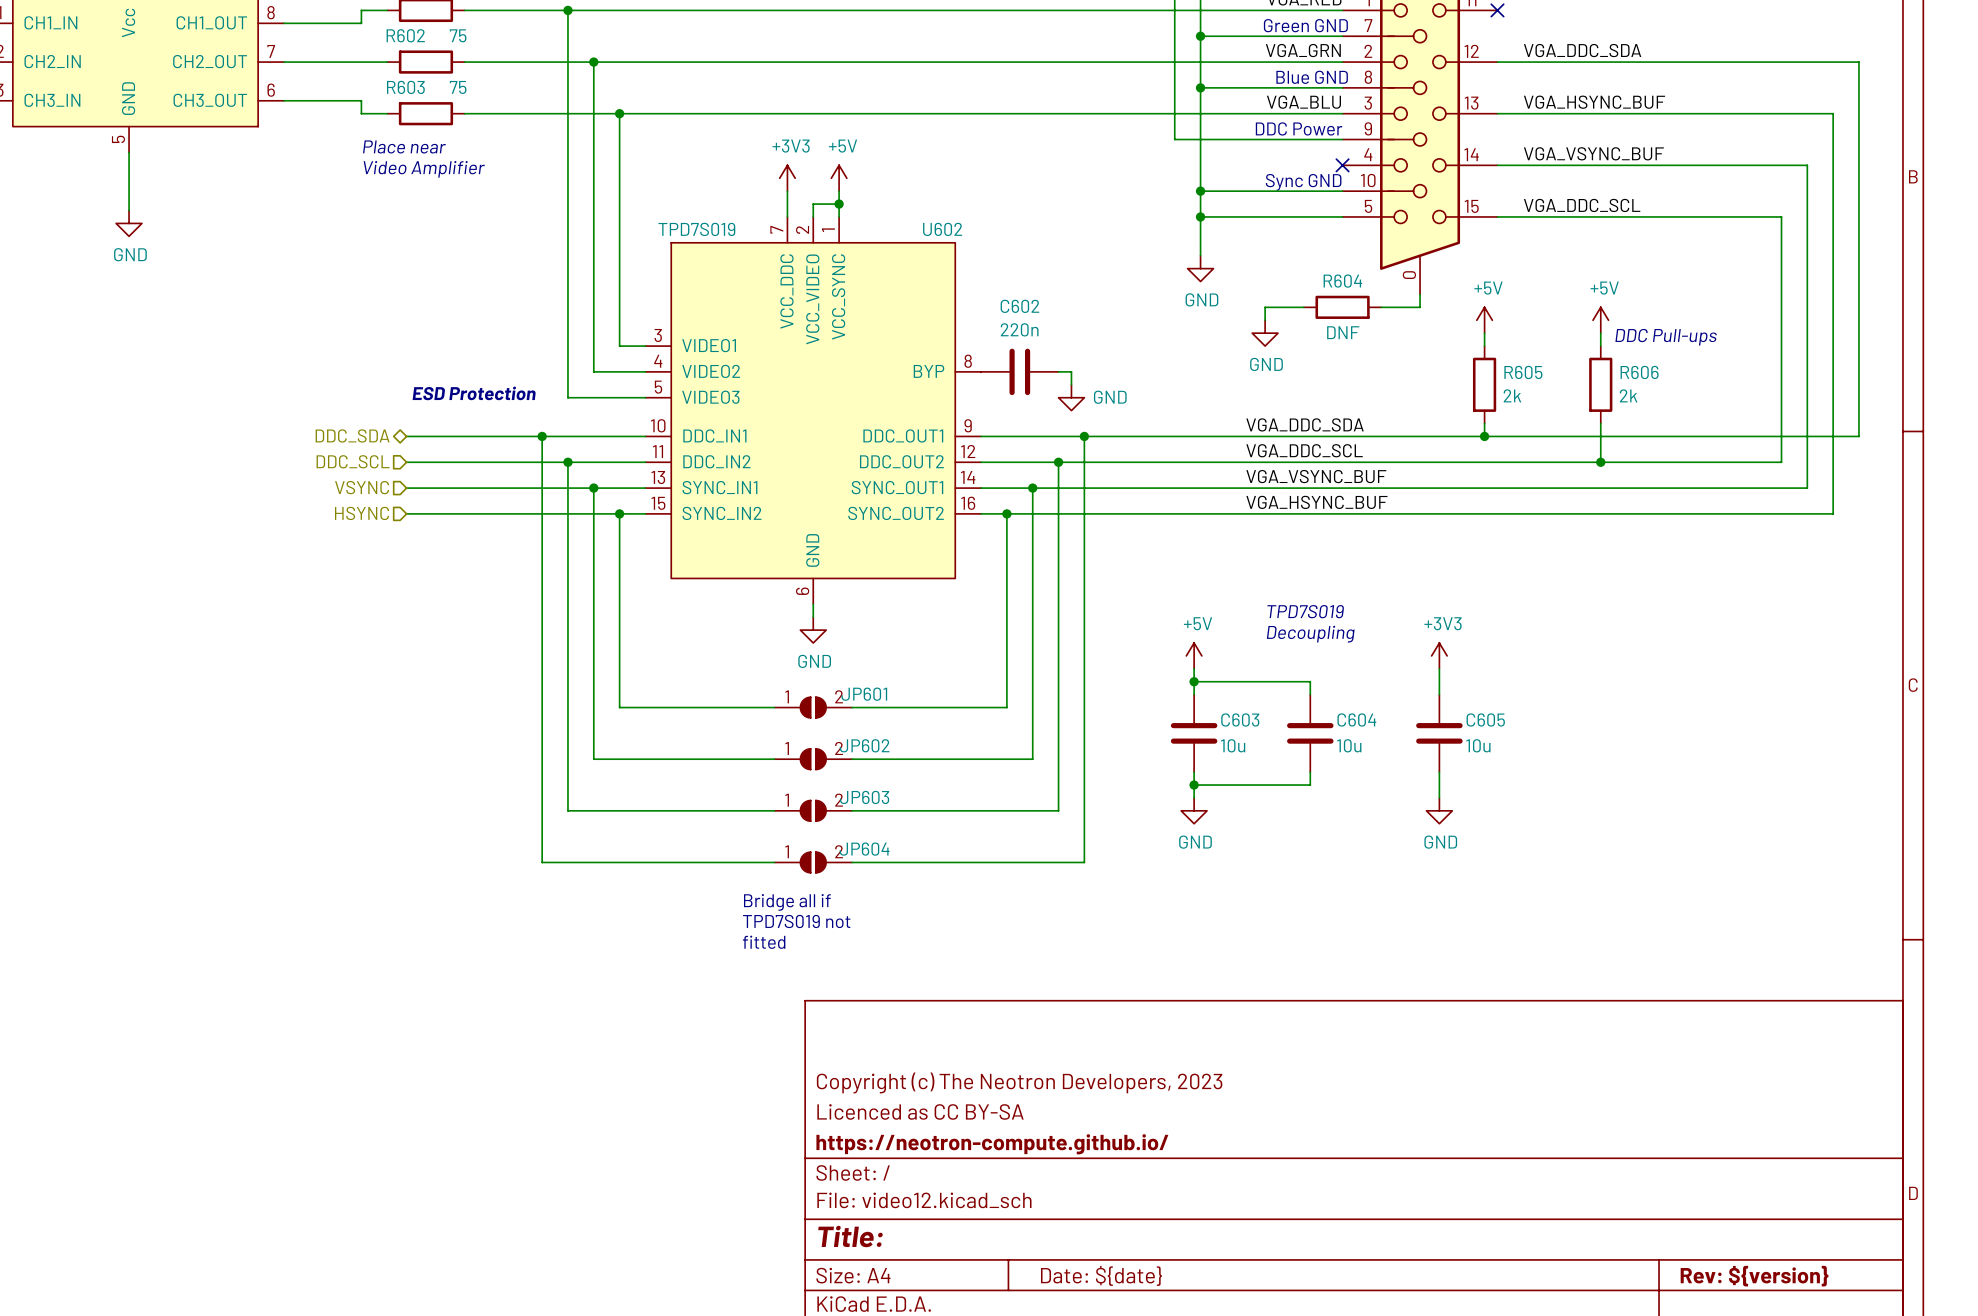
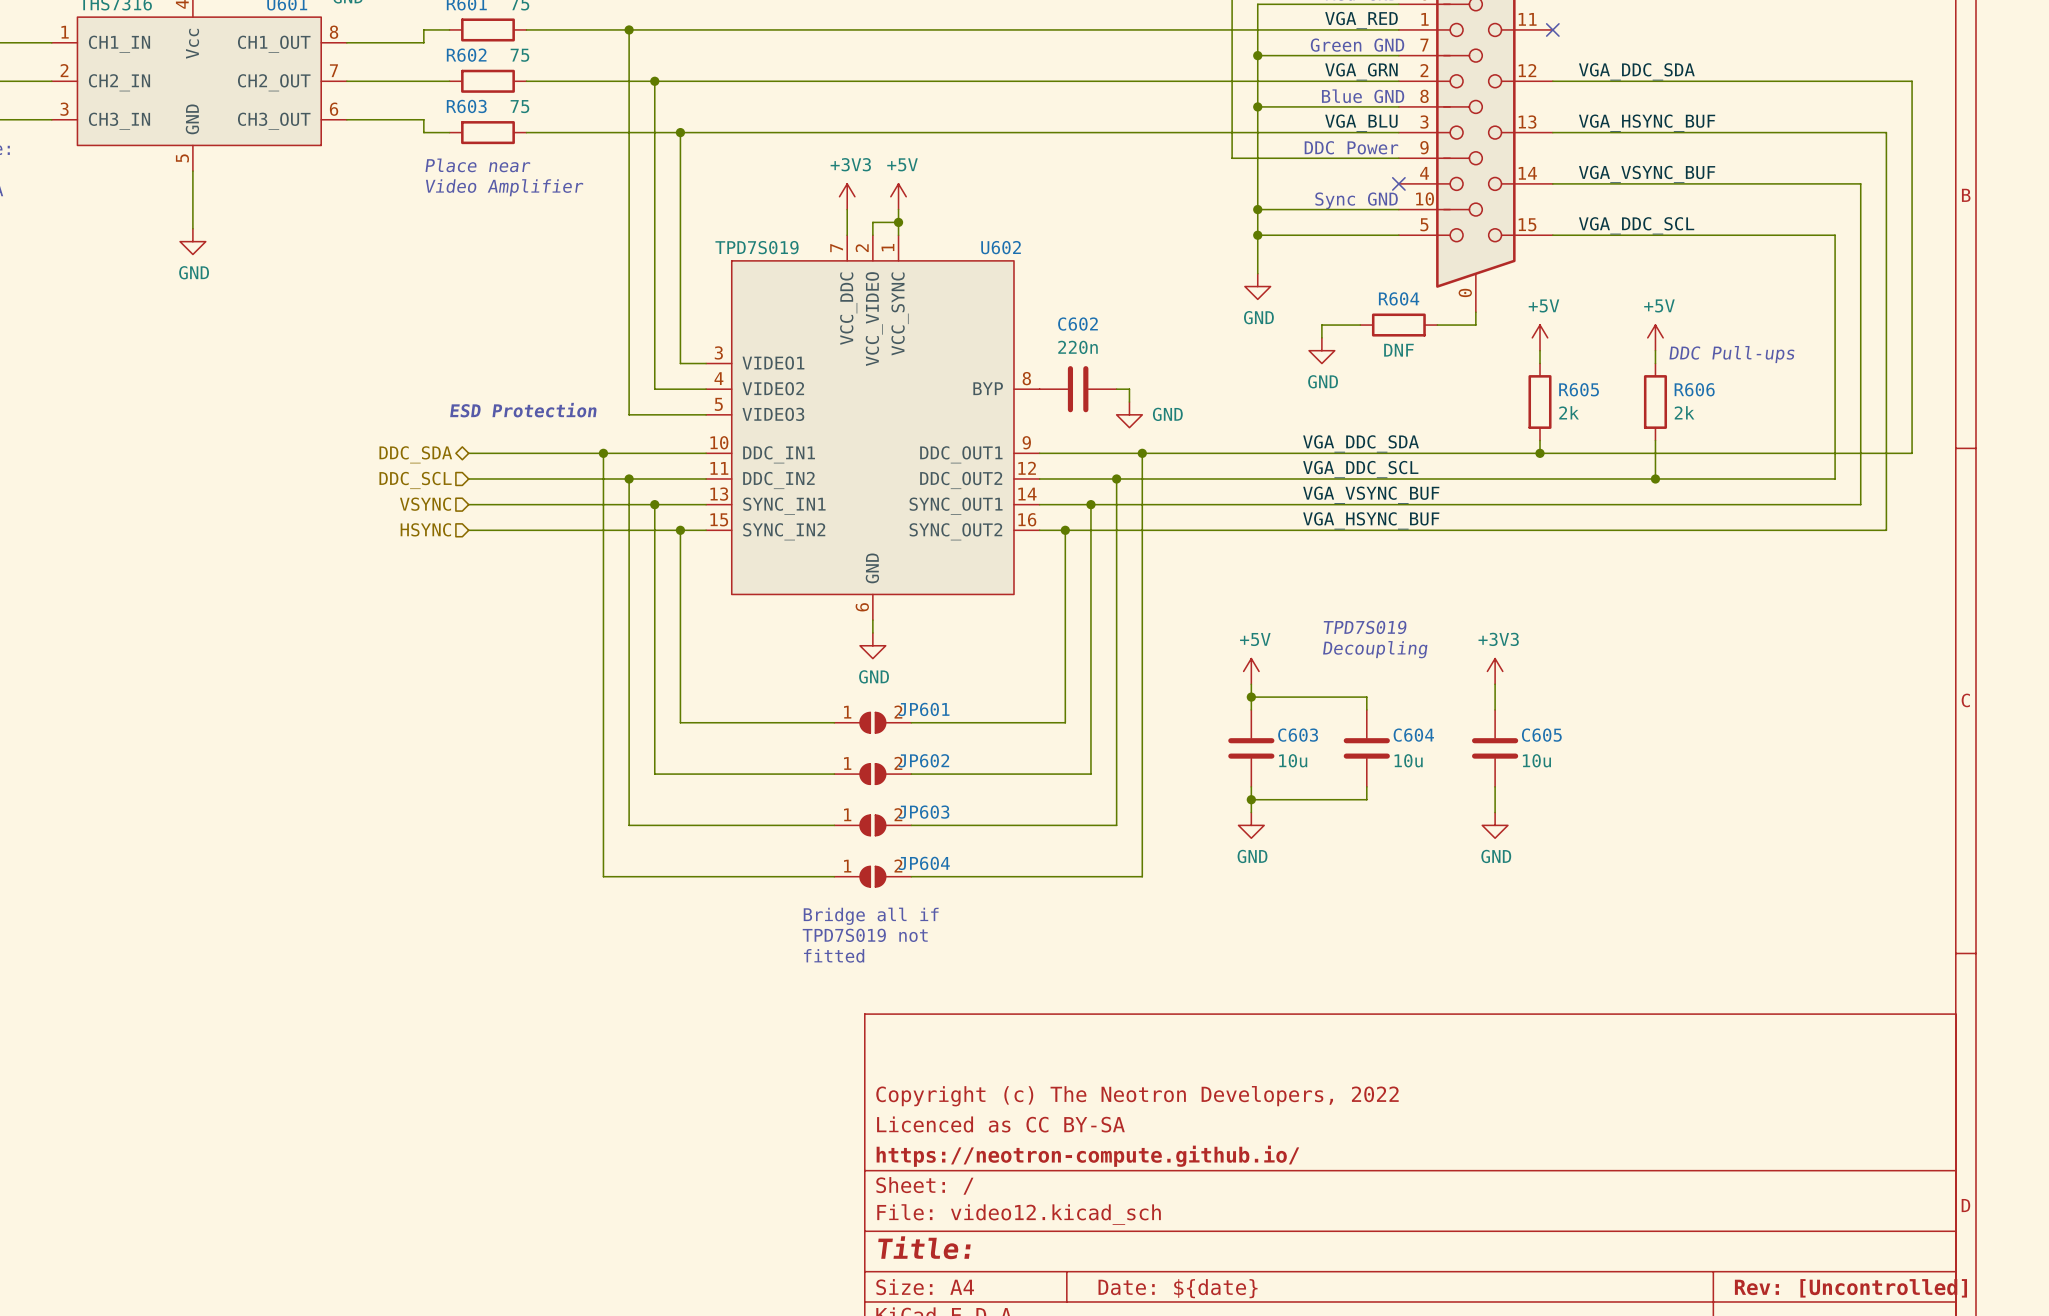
title block: Copyright (c) The Neotron Developers, 2023 (1019, 1082) -> Copyright (c) The Neotron Developers, 2022 (1137, 1096)
title block: Rev: ${version} (1754, 1276) -> Rev: [Uncontrolled] (1850, 1288)

